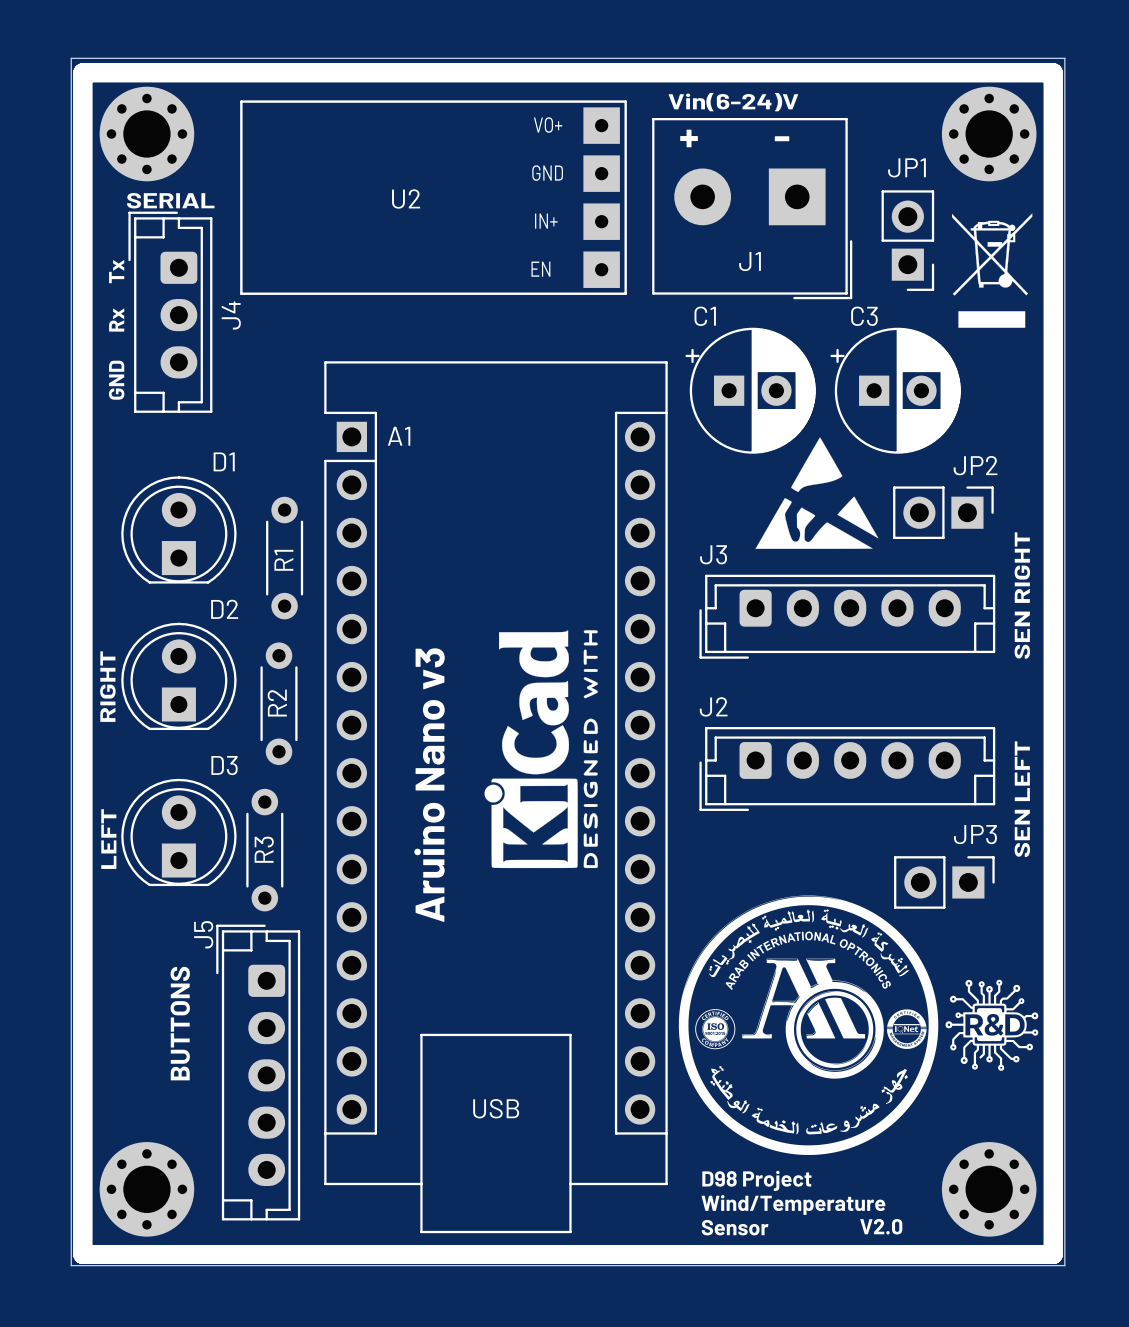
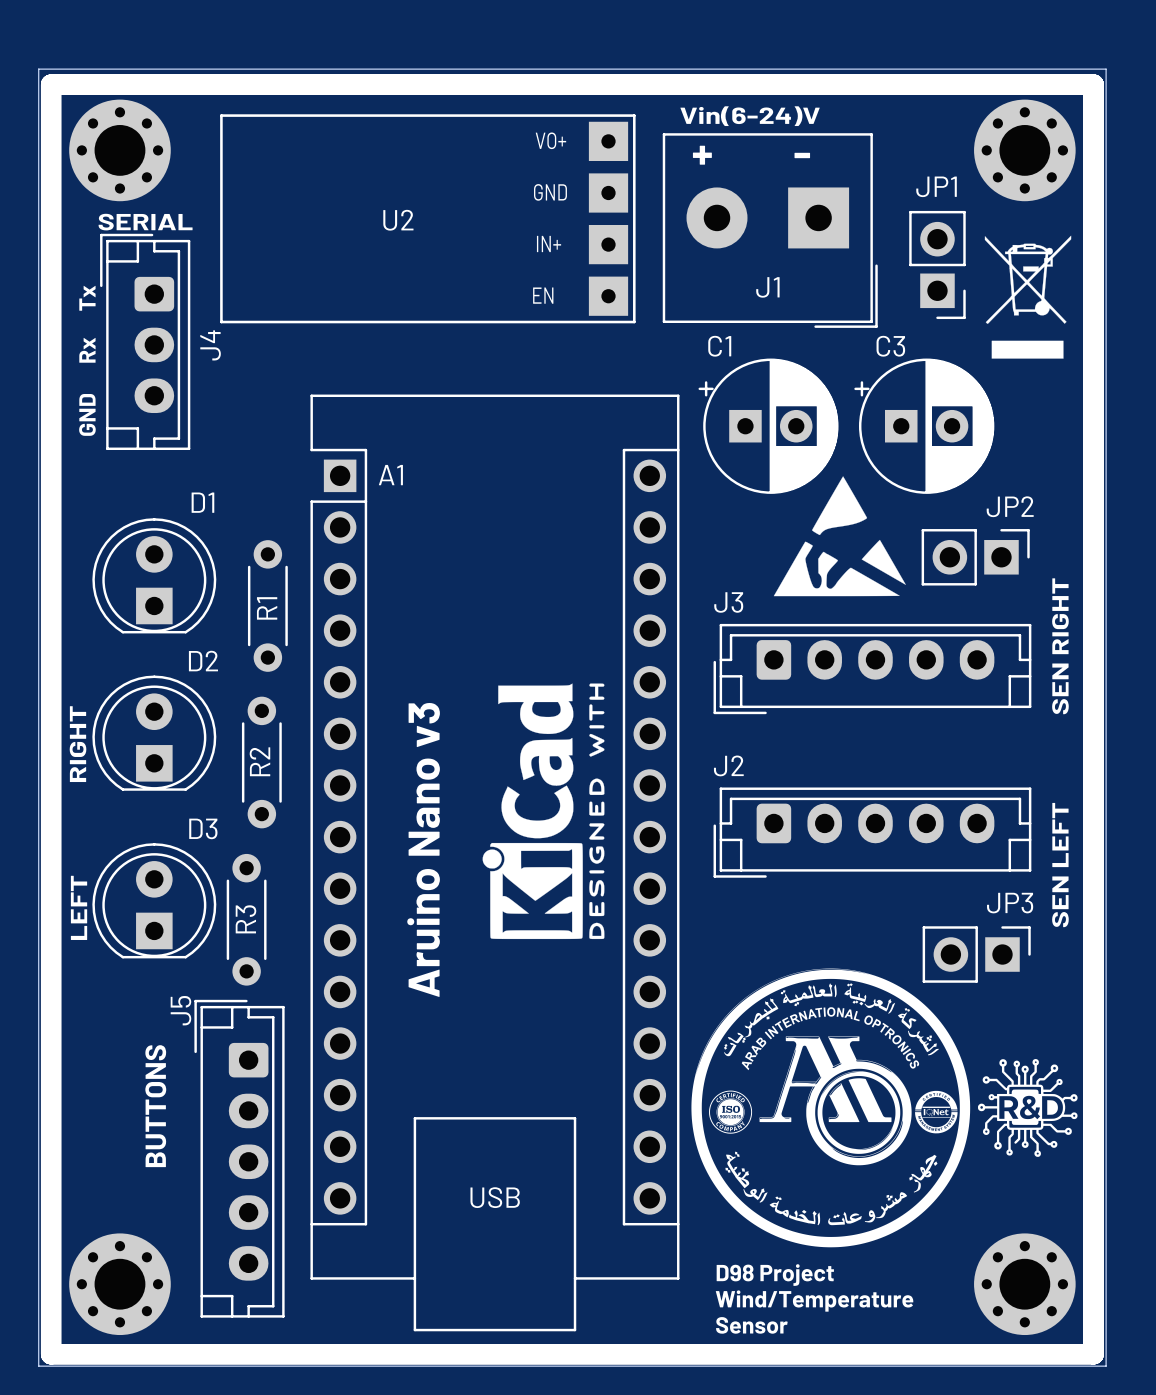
text: V2.0 (881, 1226) -> none

